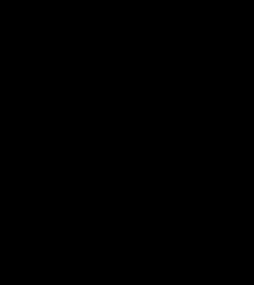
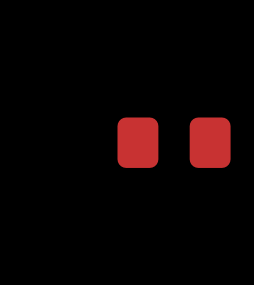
part: none -> (174, 142)

